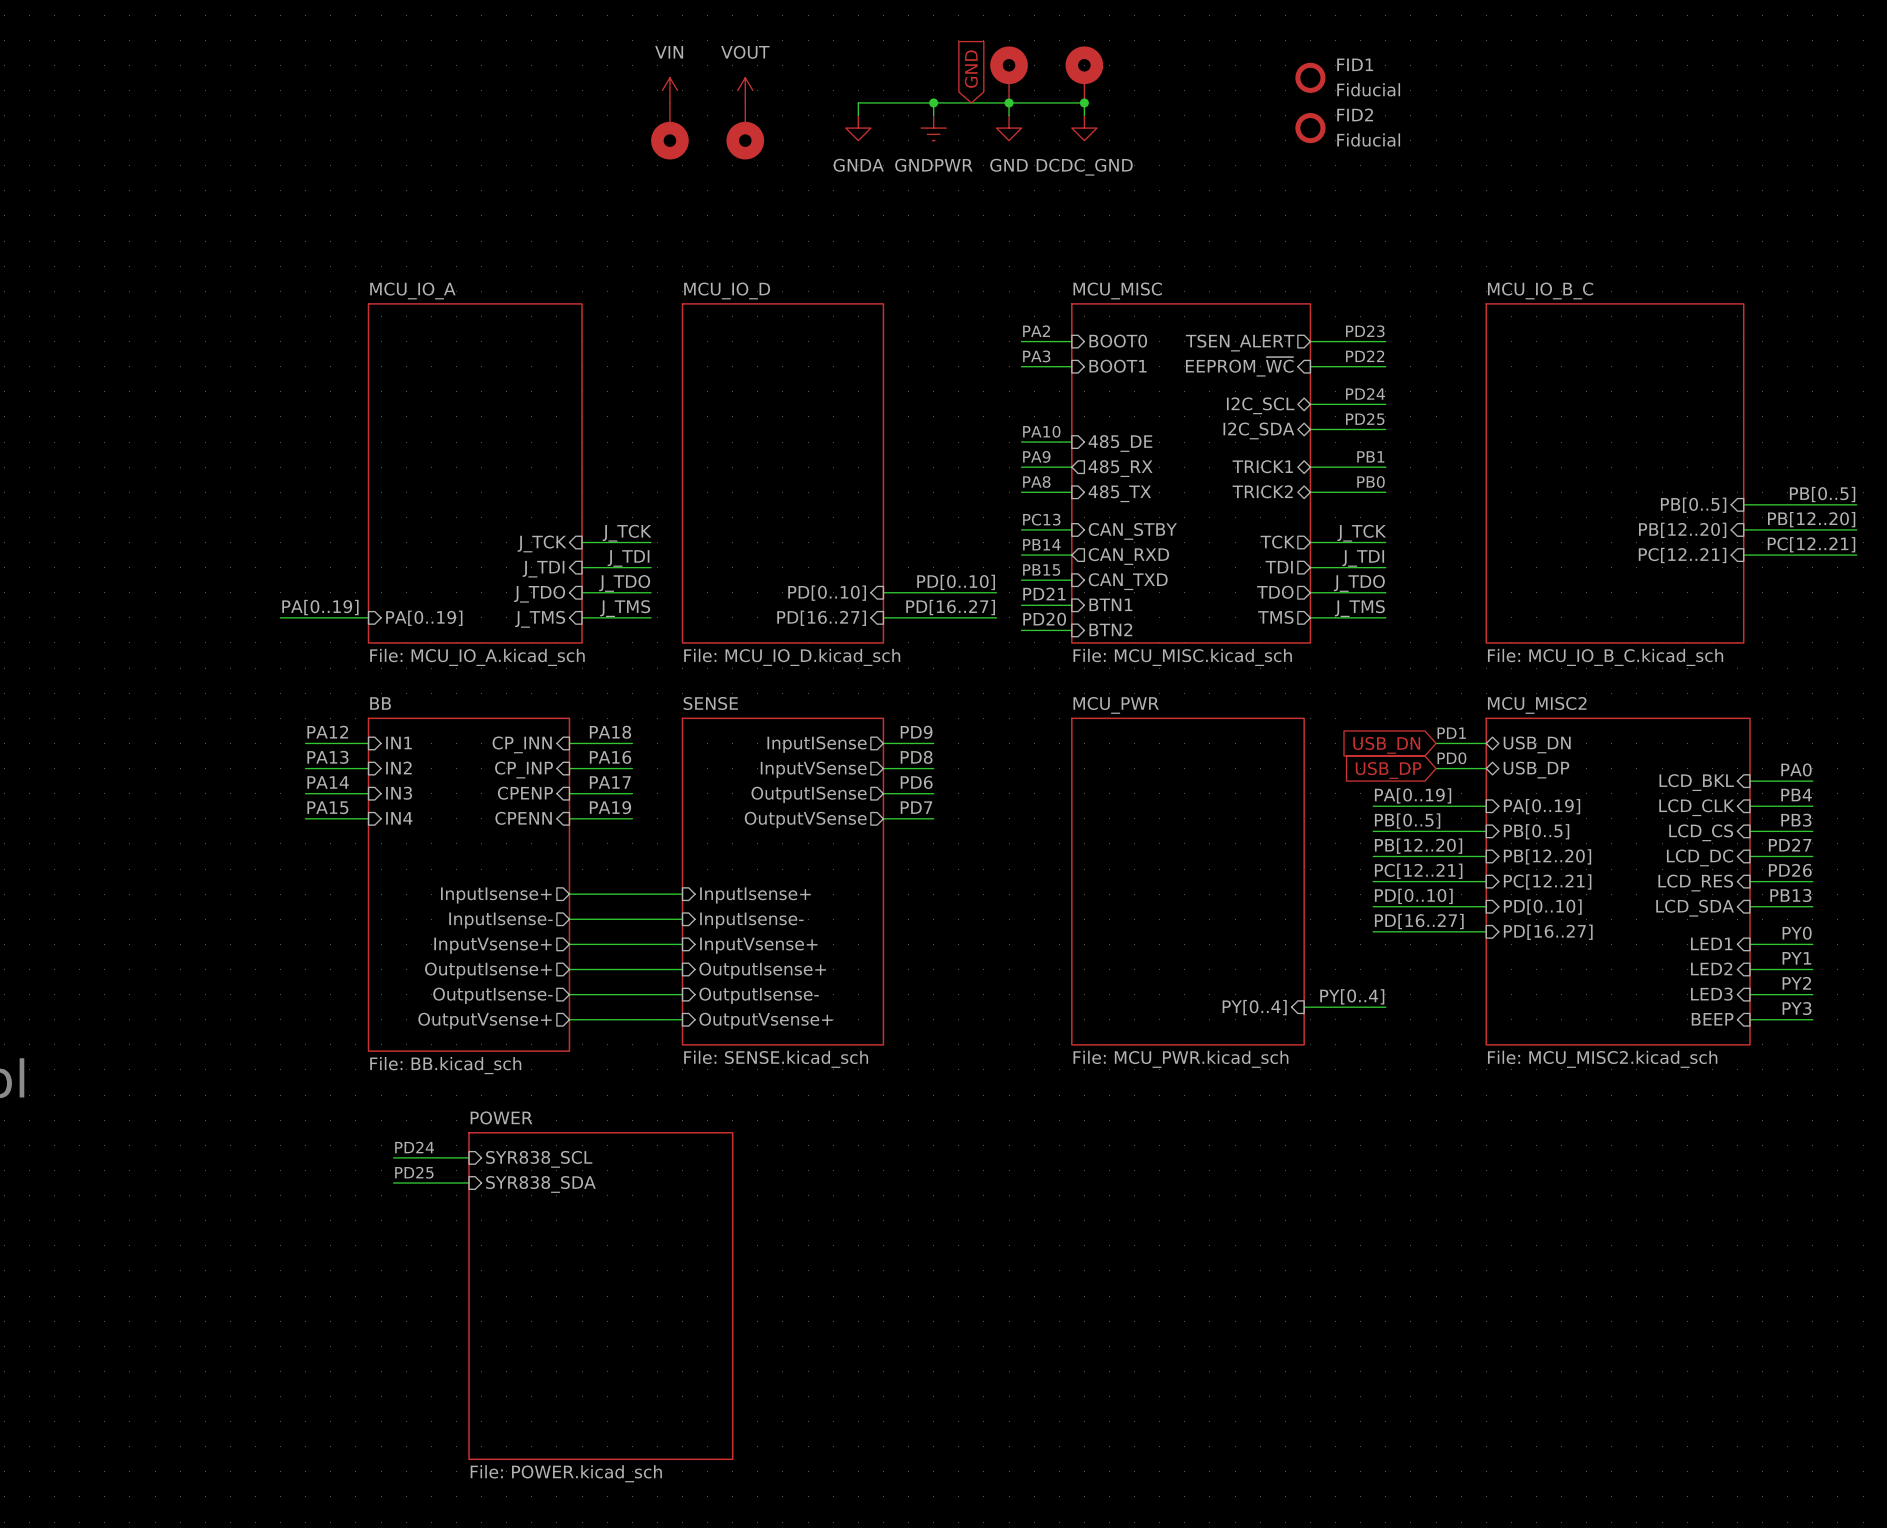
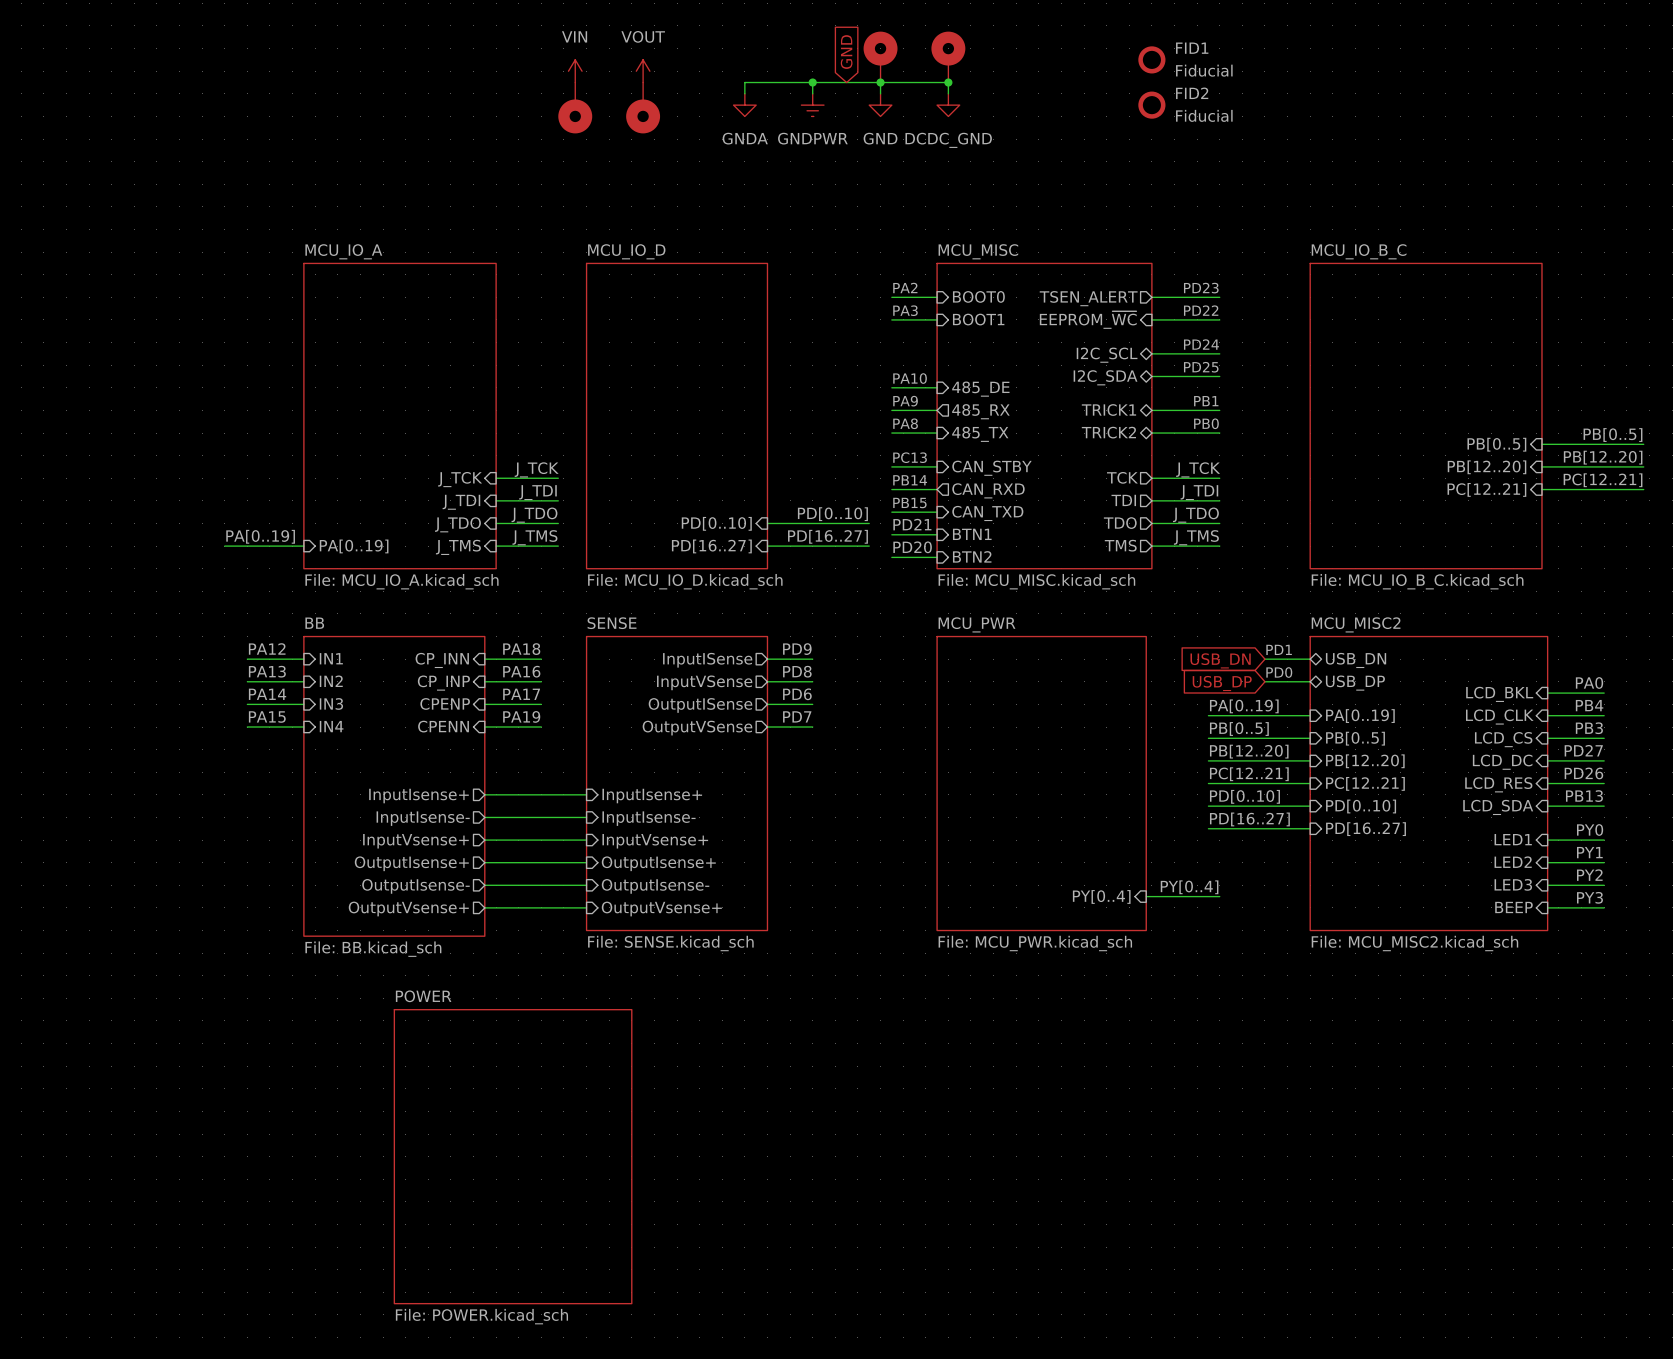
label: PD24 (414, 1147) -> none
wire: (393, 1157) (468, 1157) -> none
sheet pin: SYR838_SCL (539, 1159) -> none
label: PD25 (414, 1172) -> none
wire: (393, 1183) (468, 1183) -> none
sheet pin: SYR838_SDA (540, 1184) -> none

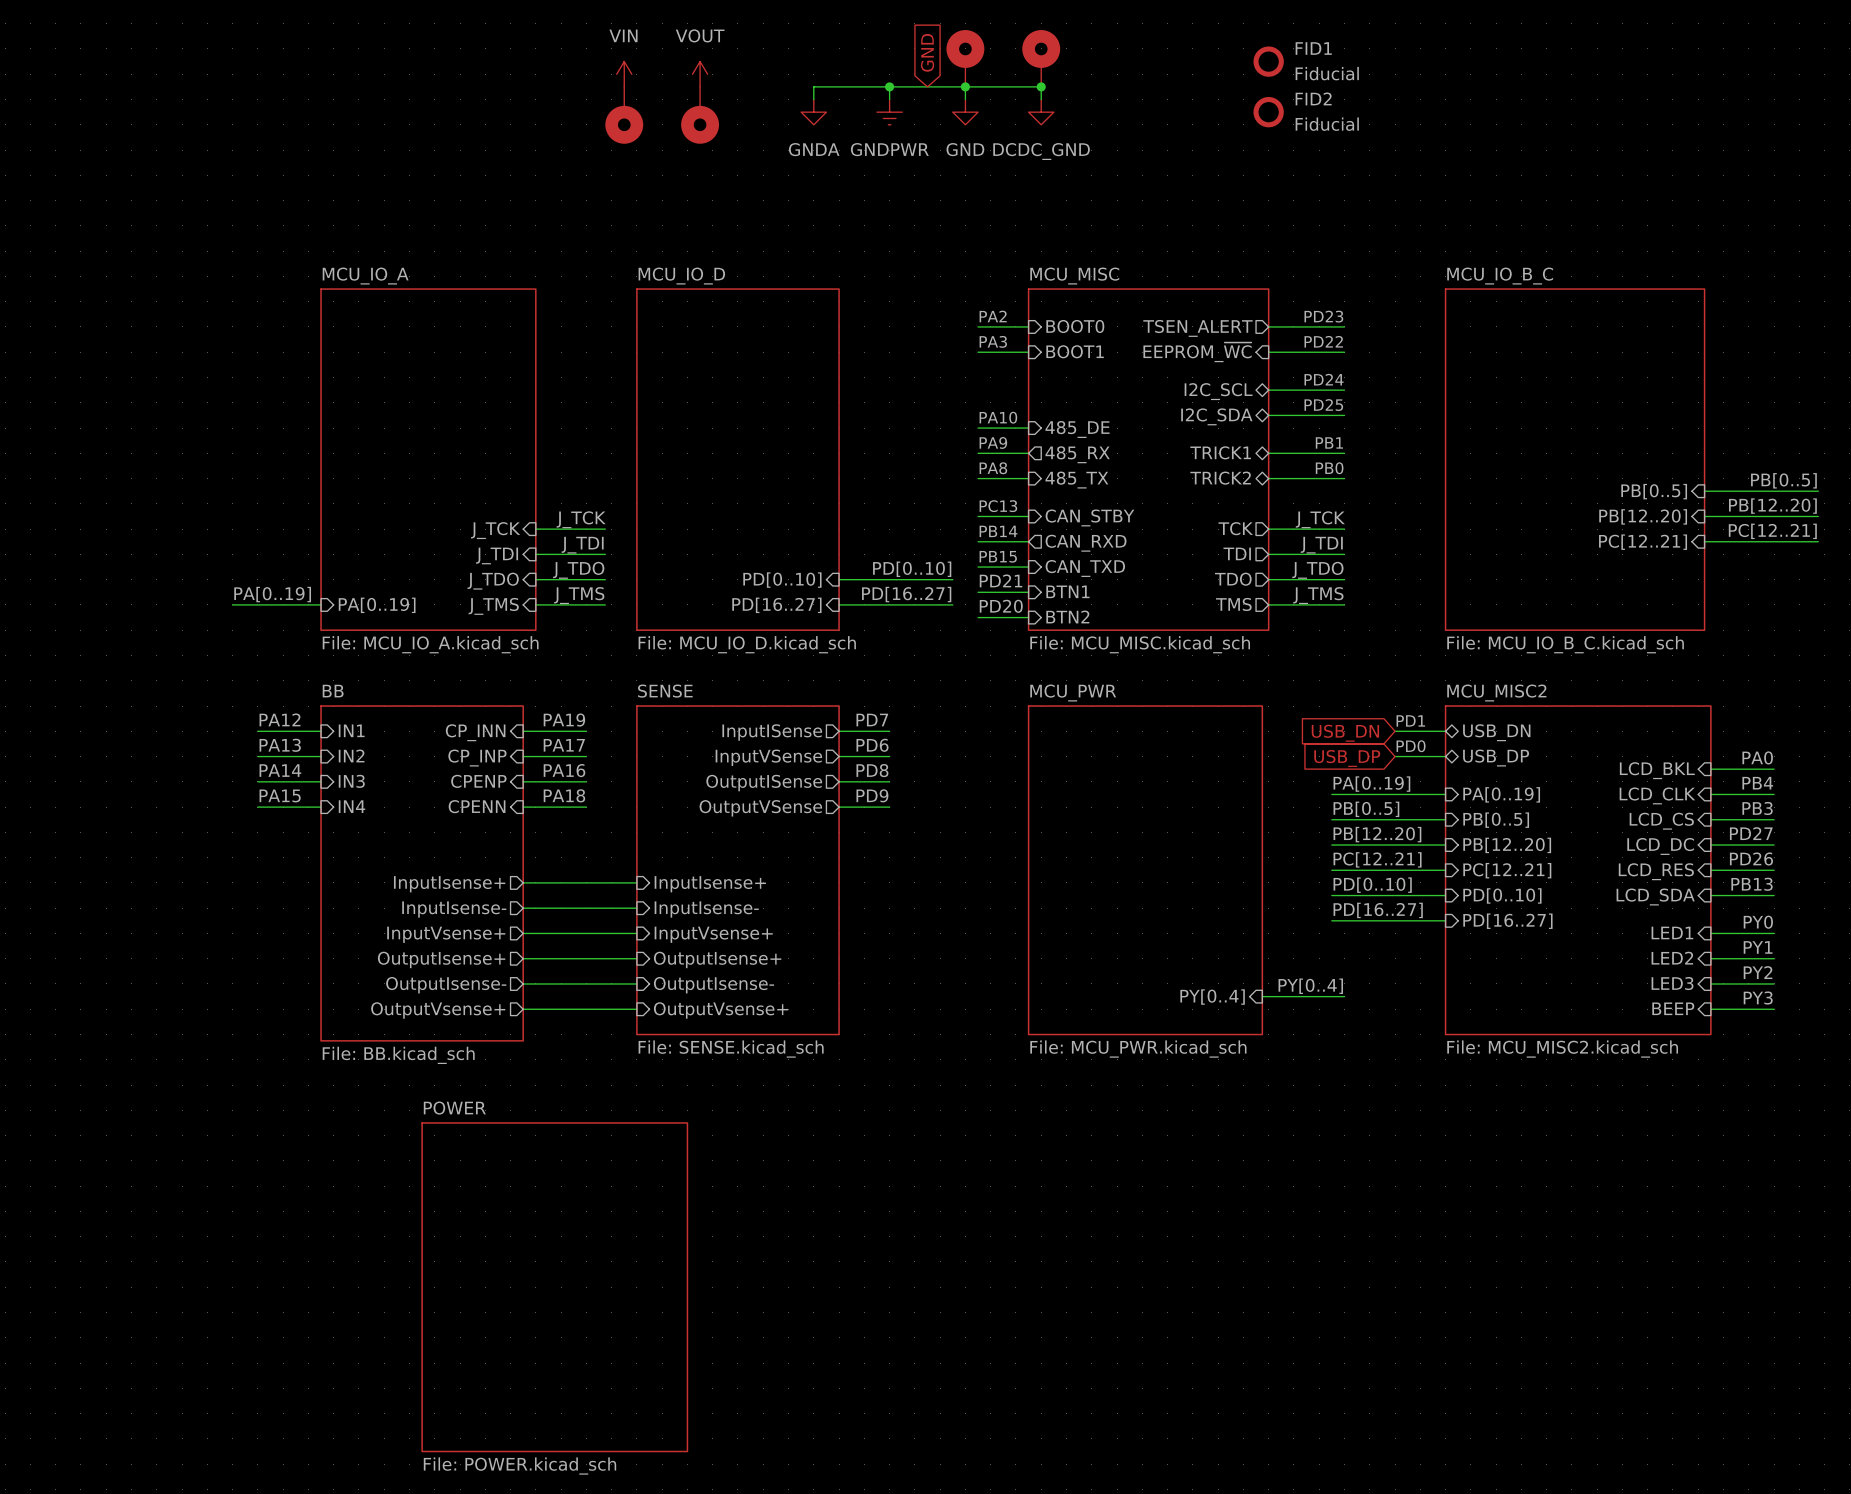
label: PA18 (521, 649) -> PA19 (564, 720)
label: PD9 (797, 649) -> PD7 (872, 720)
label: PA16 (521, 671) -> PA17 (564, 745)
label: PD8 (797, 671) -> PD6 (872, 745)
label: PA17 (521, 694) -> PA16 (564, 770)
label: PD6 (797, 694) -> PD8 (872, 770)
label: PA19 (521, 716) -> PA18 (564, 795)
label: PD7 (797, 716) -> PD9 (872, 795)

